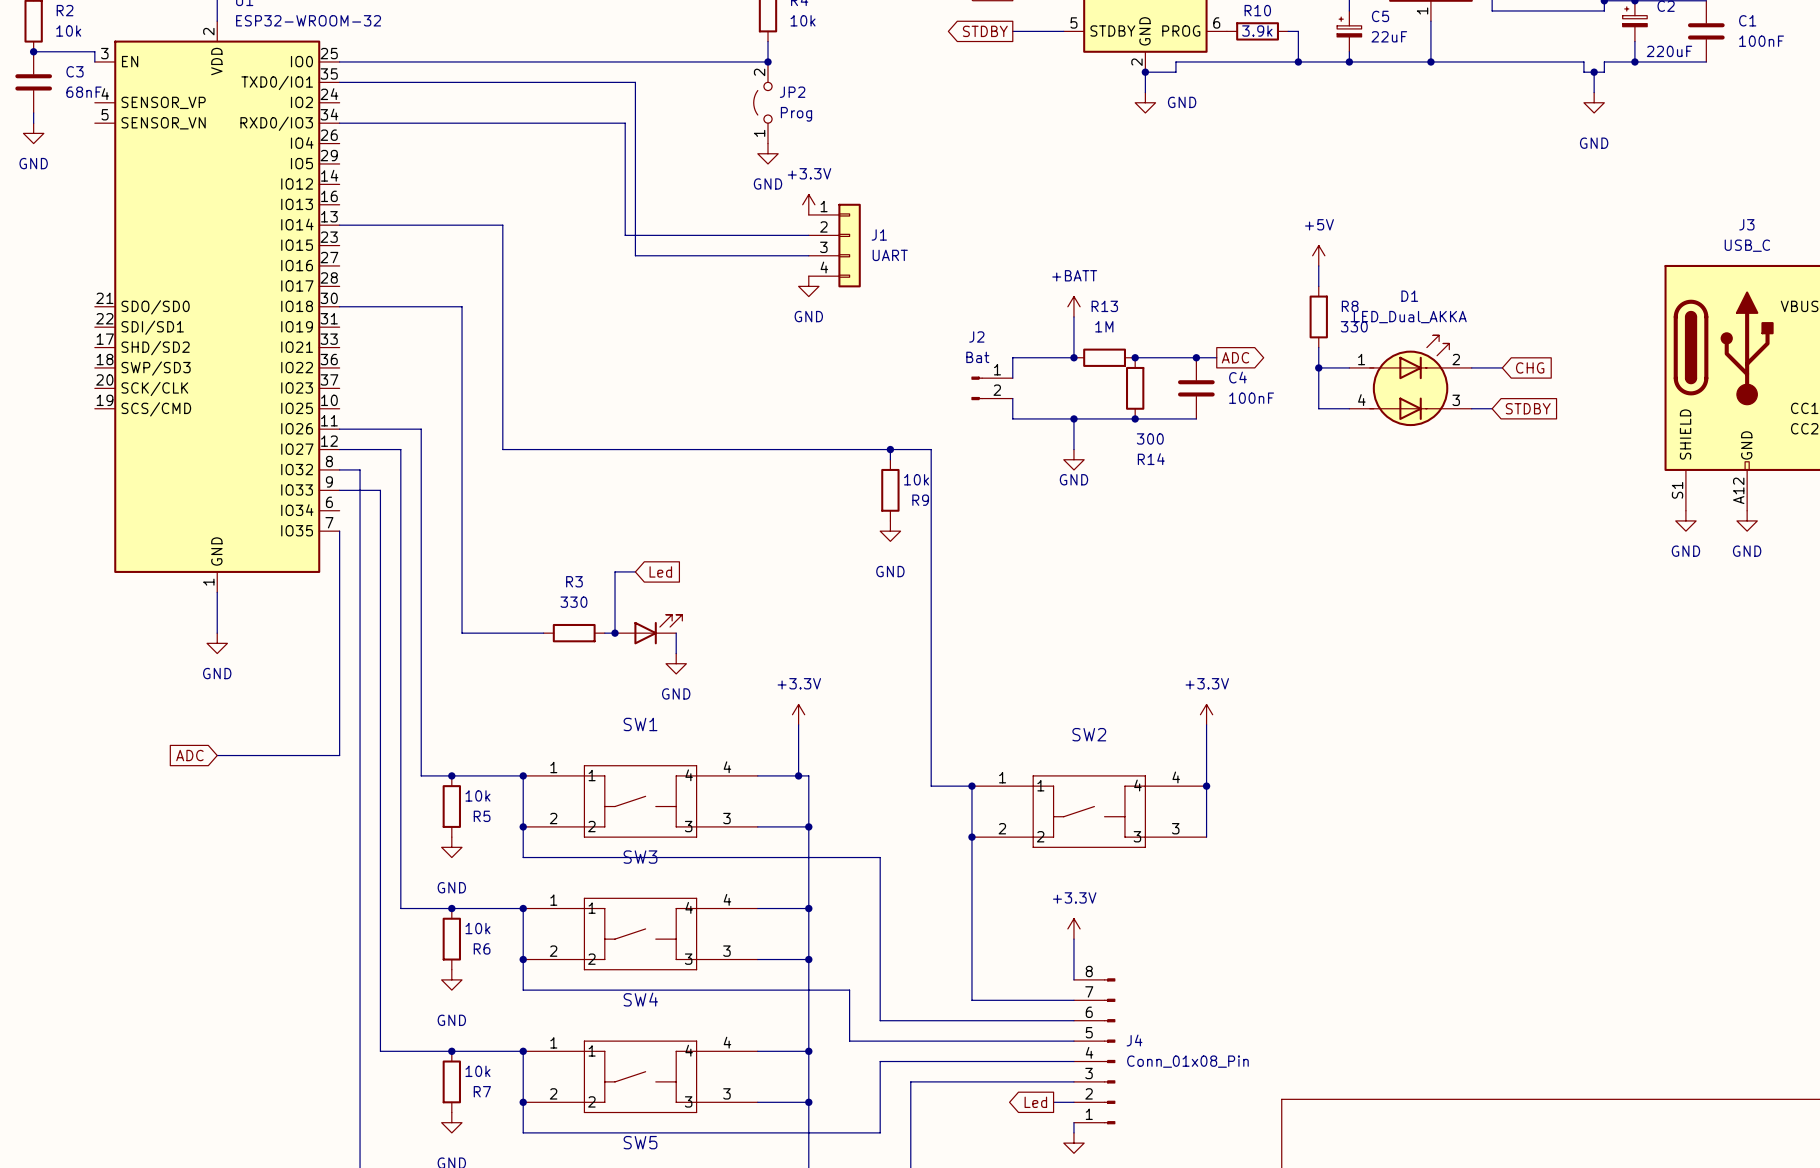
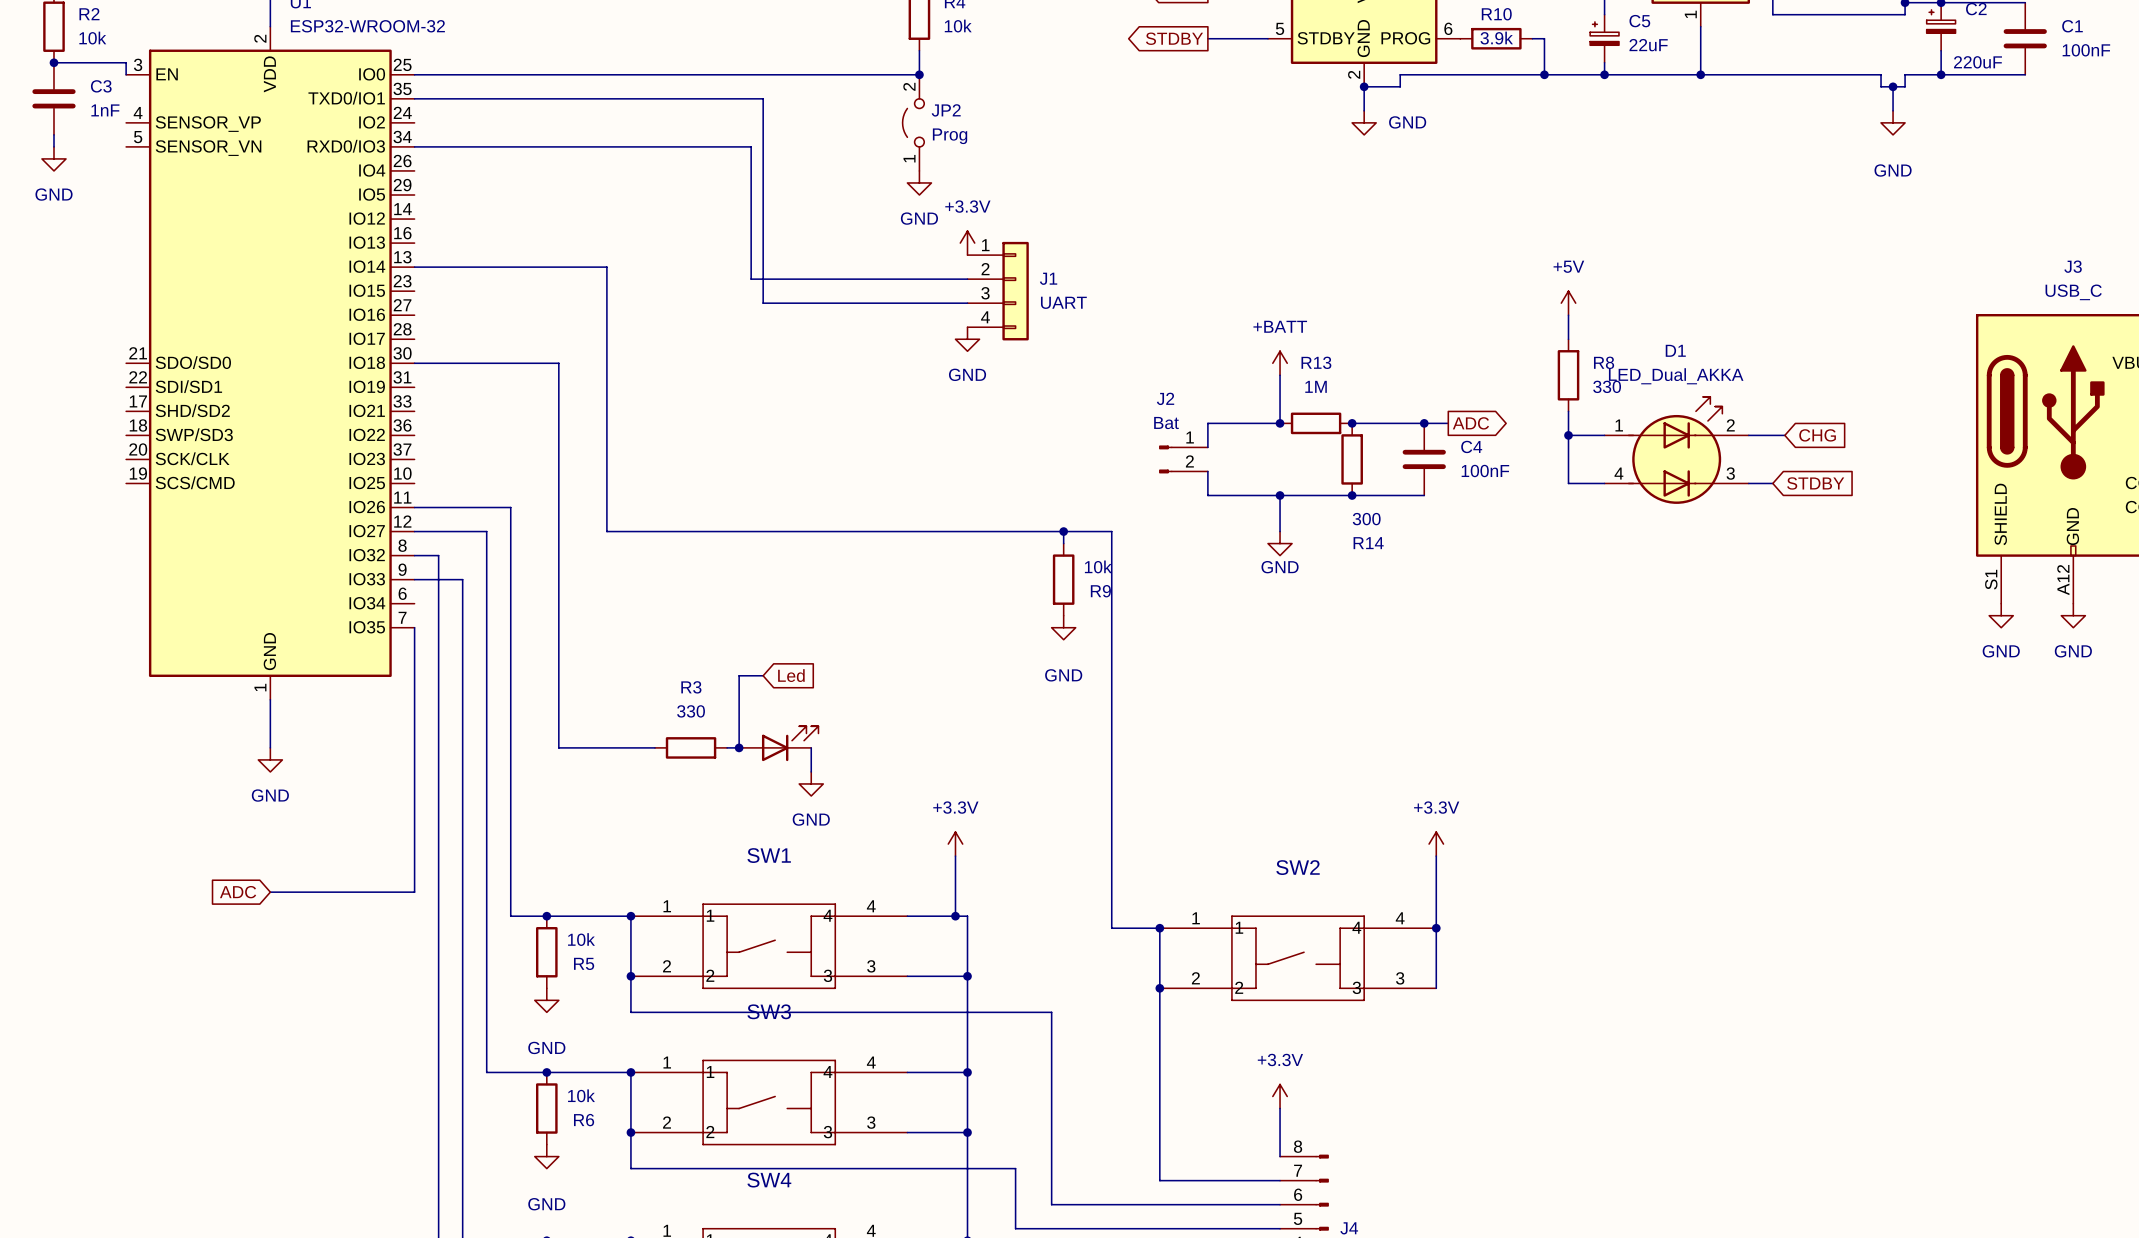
C3 value: 68nF (83, 92) -> 1nF (105, 110)

